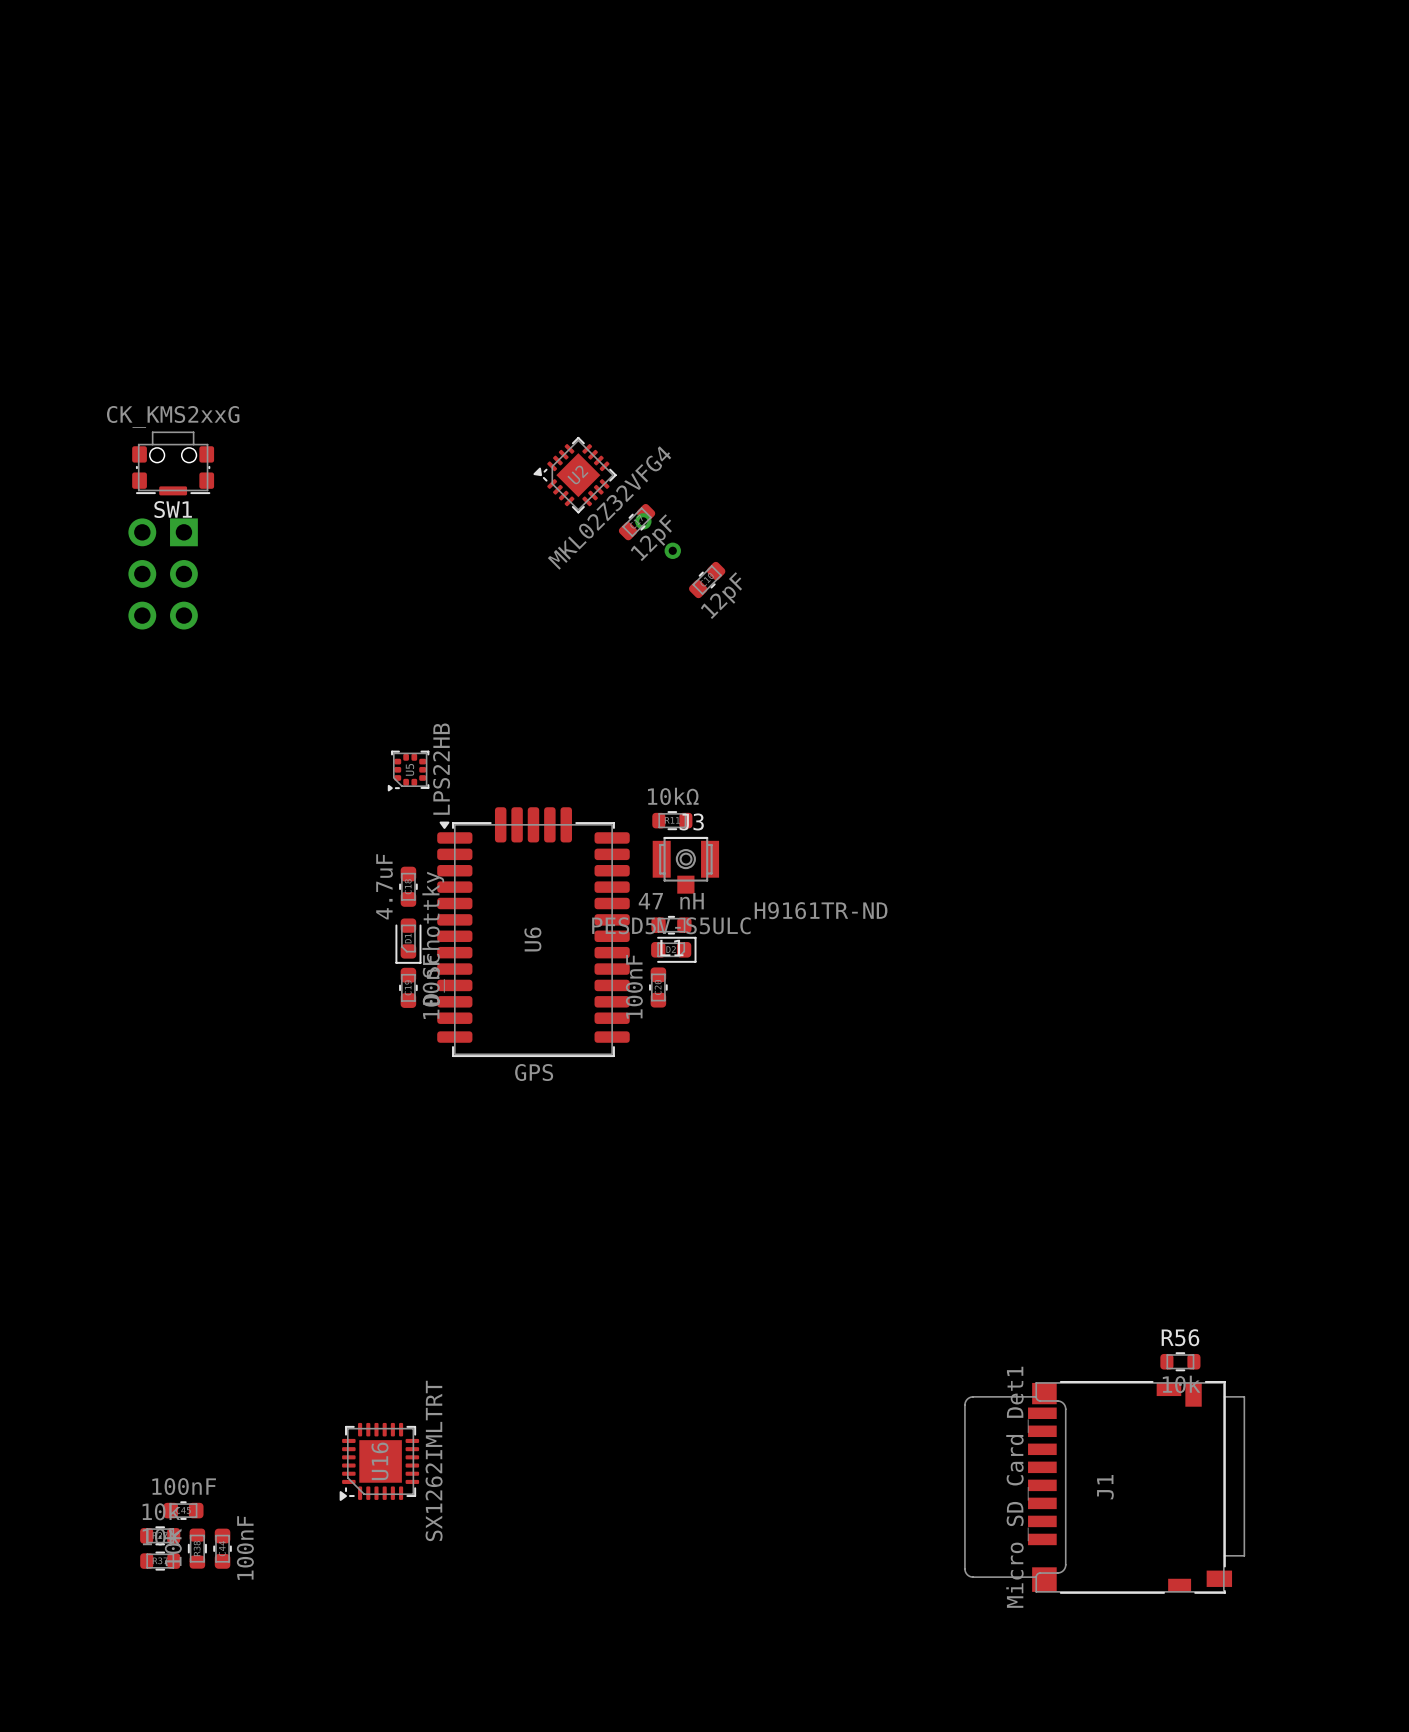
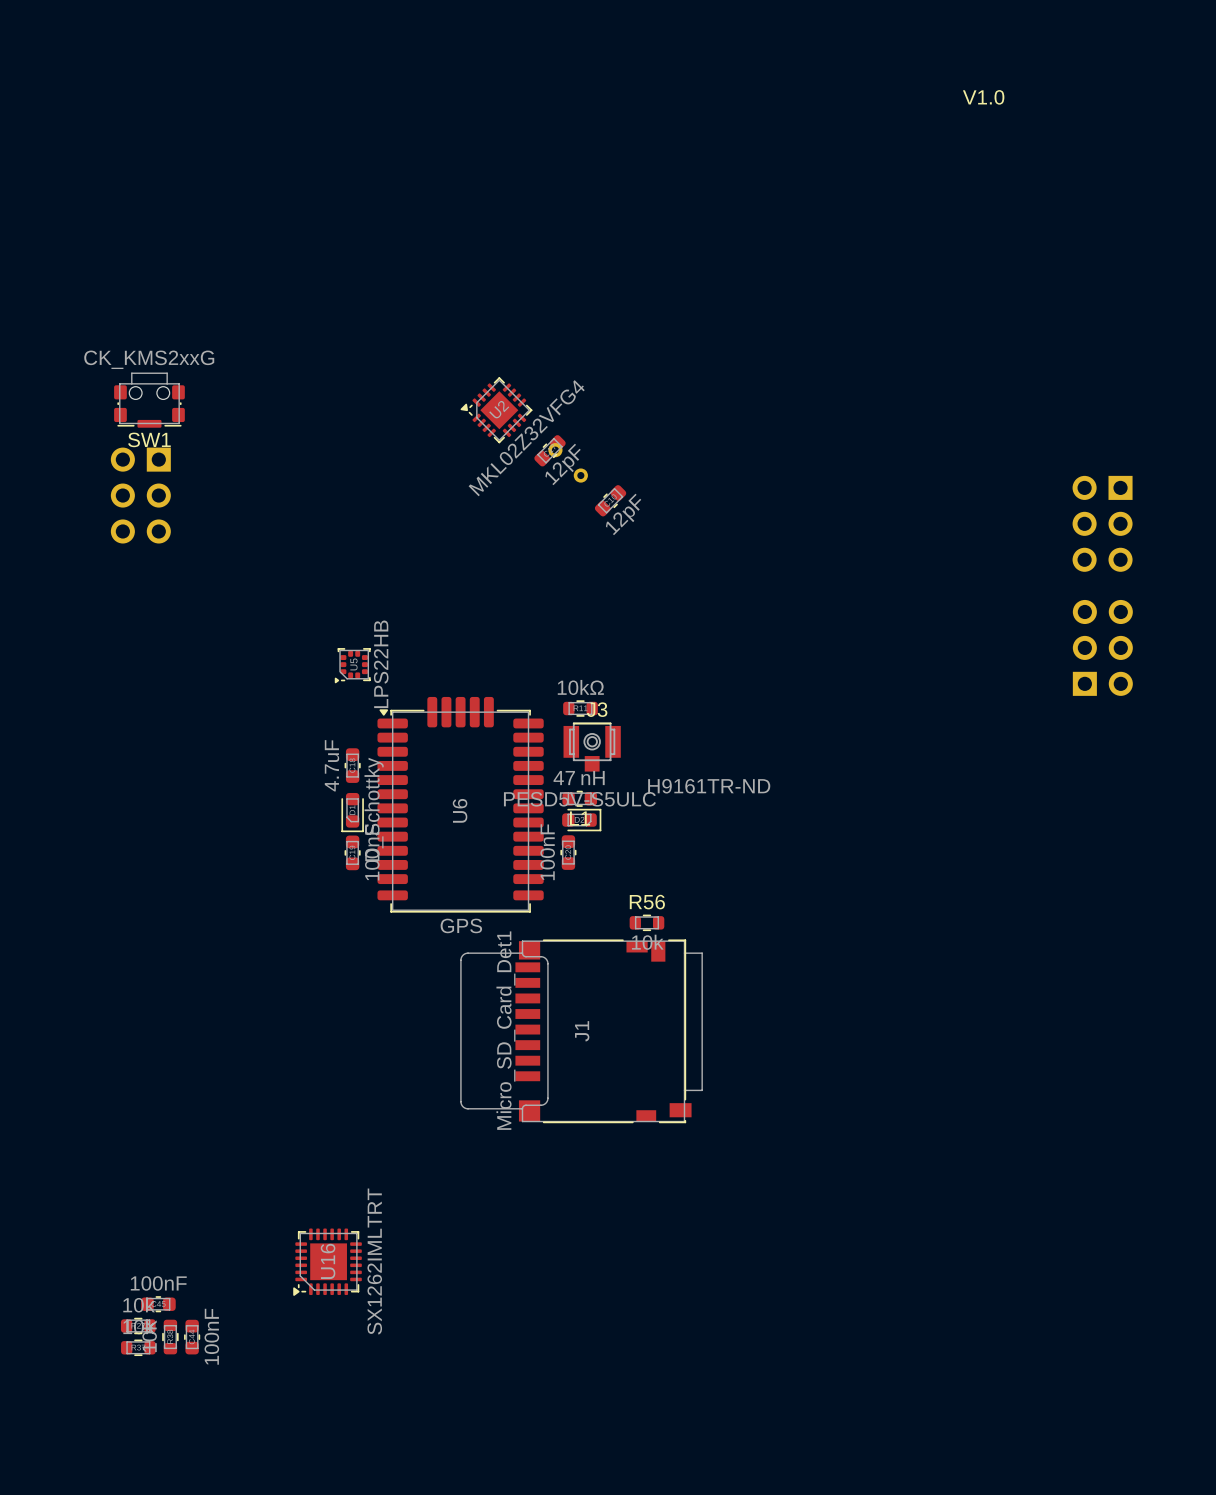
text: none -> V1.0 (983, 97)
part: none -> (1102, 523)
part: none -> (1102, 647)
R56 position: (1180, 1361) -> (646, 922)
J1 position: (1104, 1487) -> (581, 1031)

